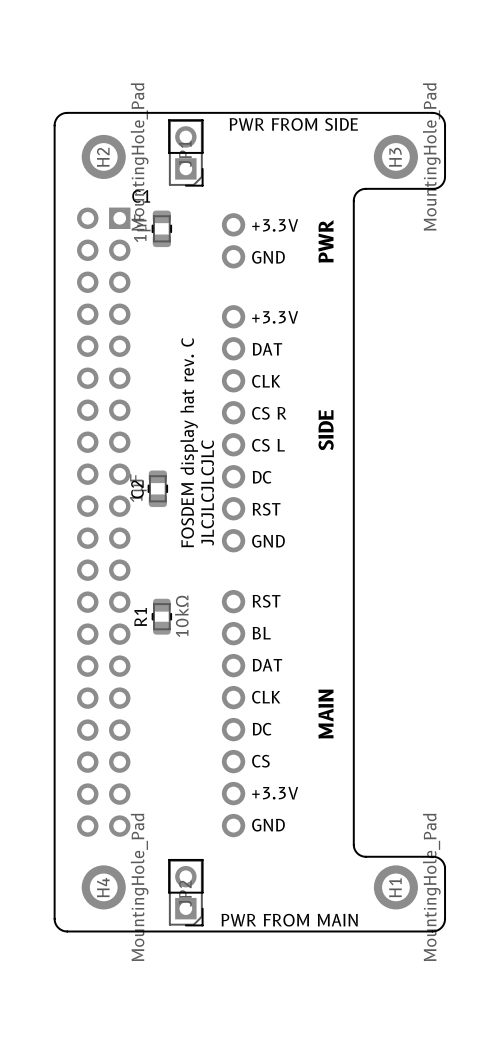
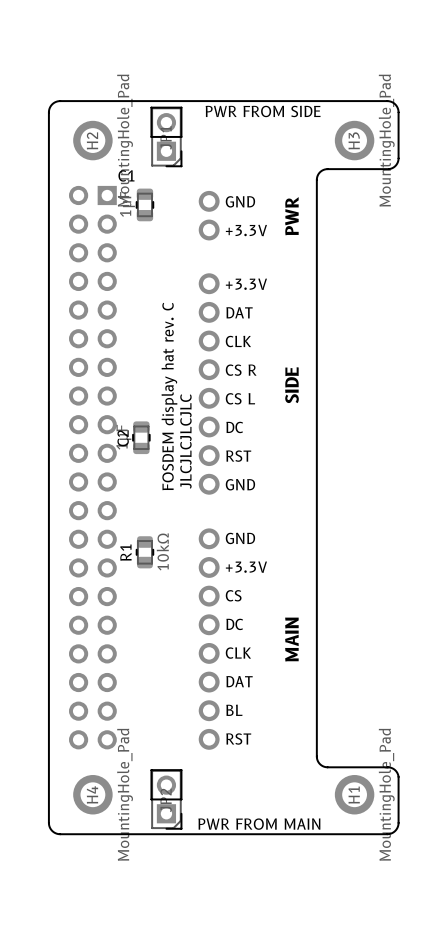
text: +3.3V (275, 225) -> GND (240, 201)
text: GND (268, 257) -> +3.3V (246, 230)
text: RST (266, 601) -> GND (240, 538)
text: BL (261, 633) -> +3.3V (246, 567)
text: DAT (267, 665) -> CS (233, 595)
text: CLK (266, 697) -> DC (234, 624)
text: DC (262, 729) -> CLK (238, 653)
text: CS (260, 761) -> DAT (239, 681)
text: +3.3V (275, 793) -> BL (234, 710)
text: GND (268, 825) -> RST (238, 739)

